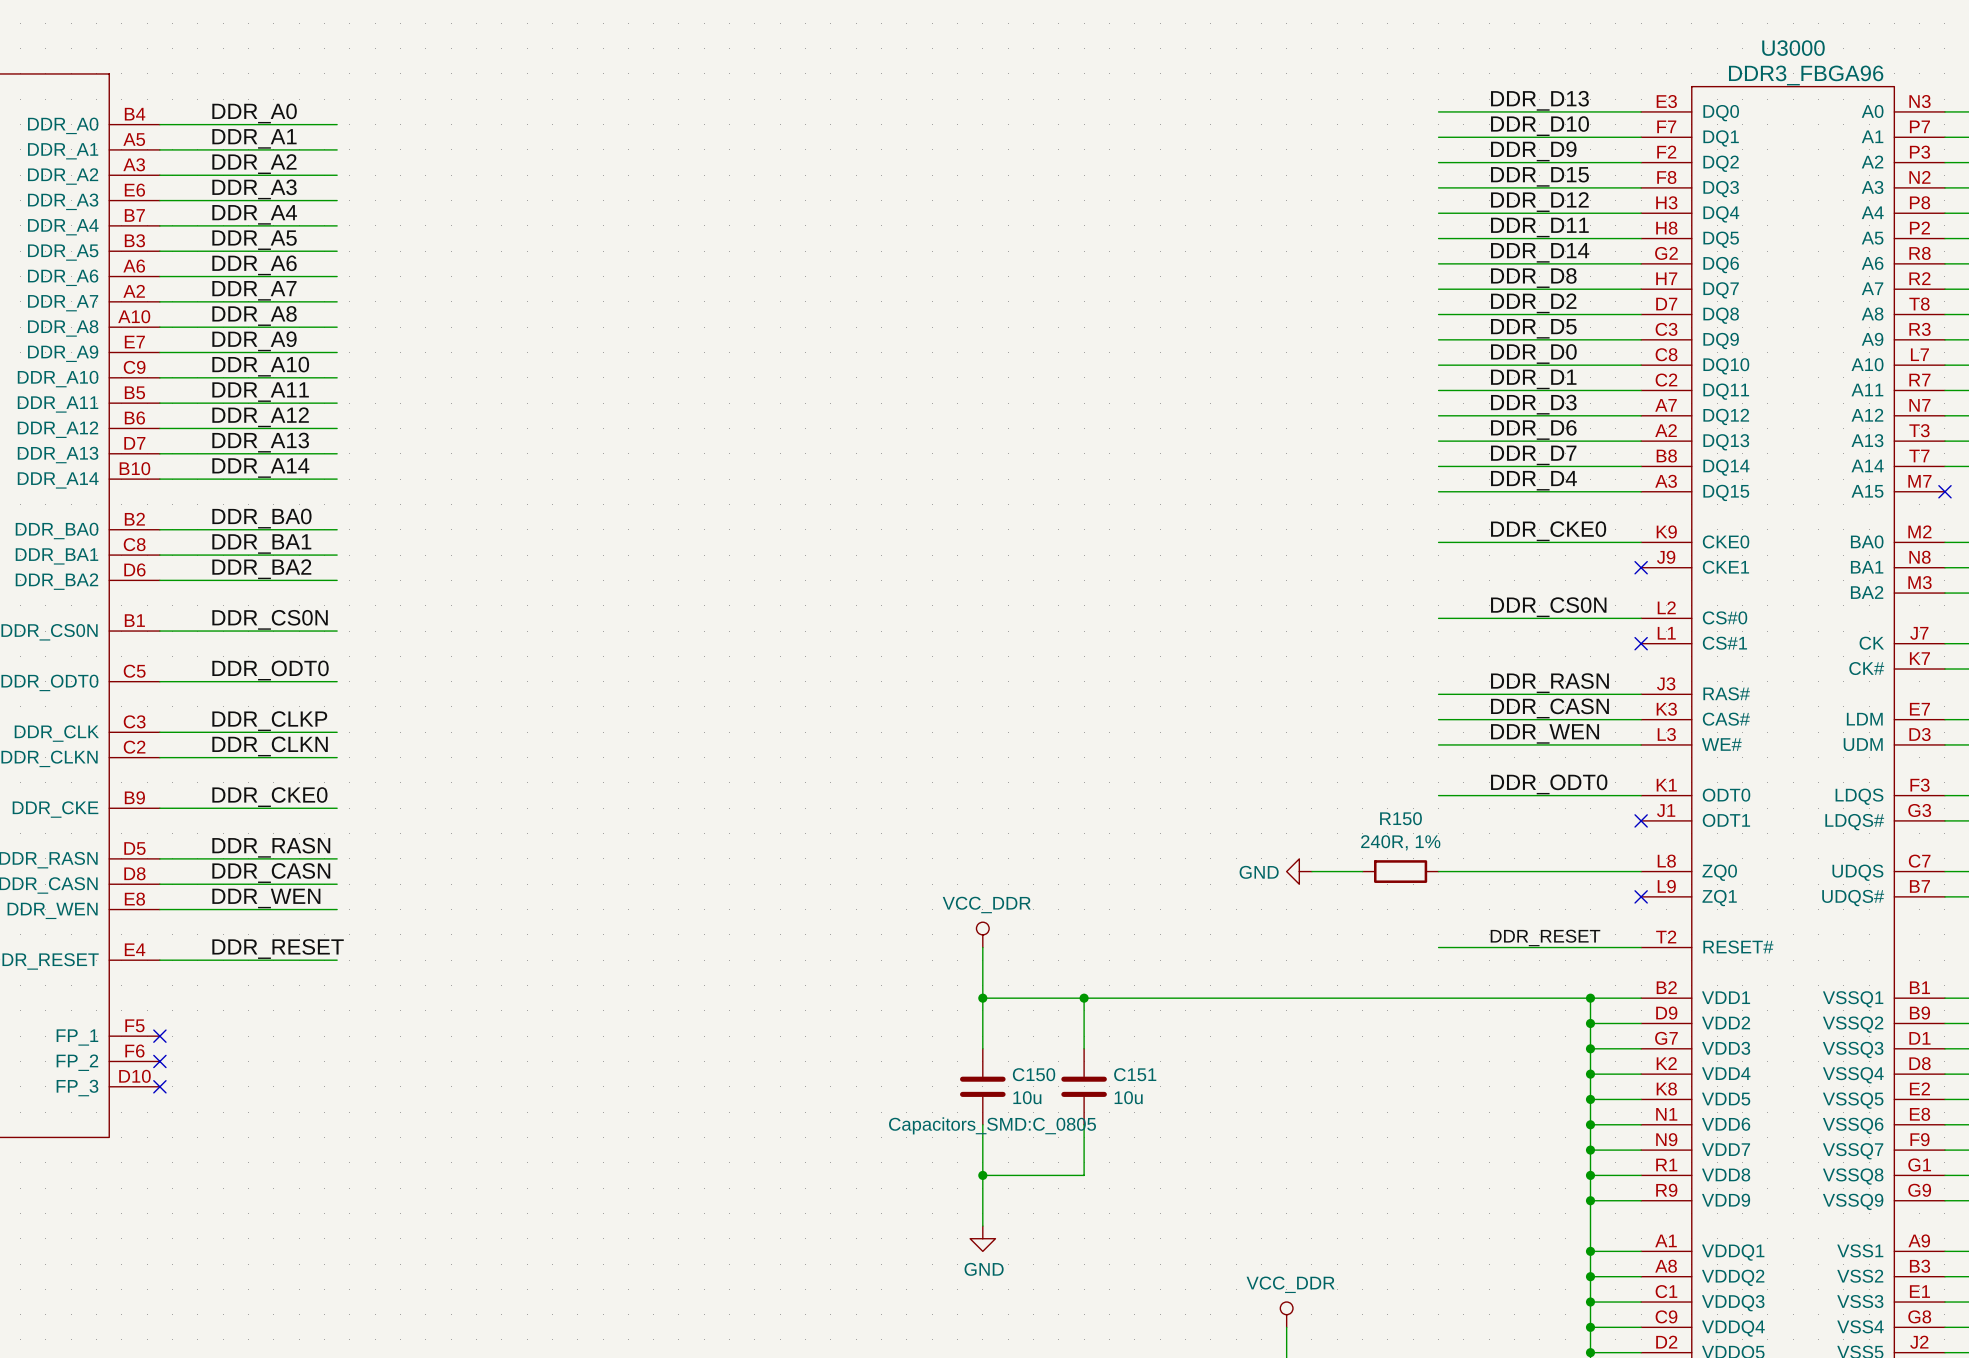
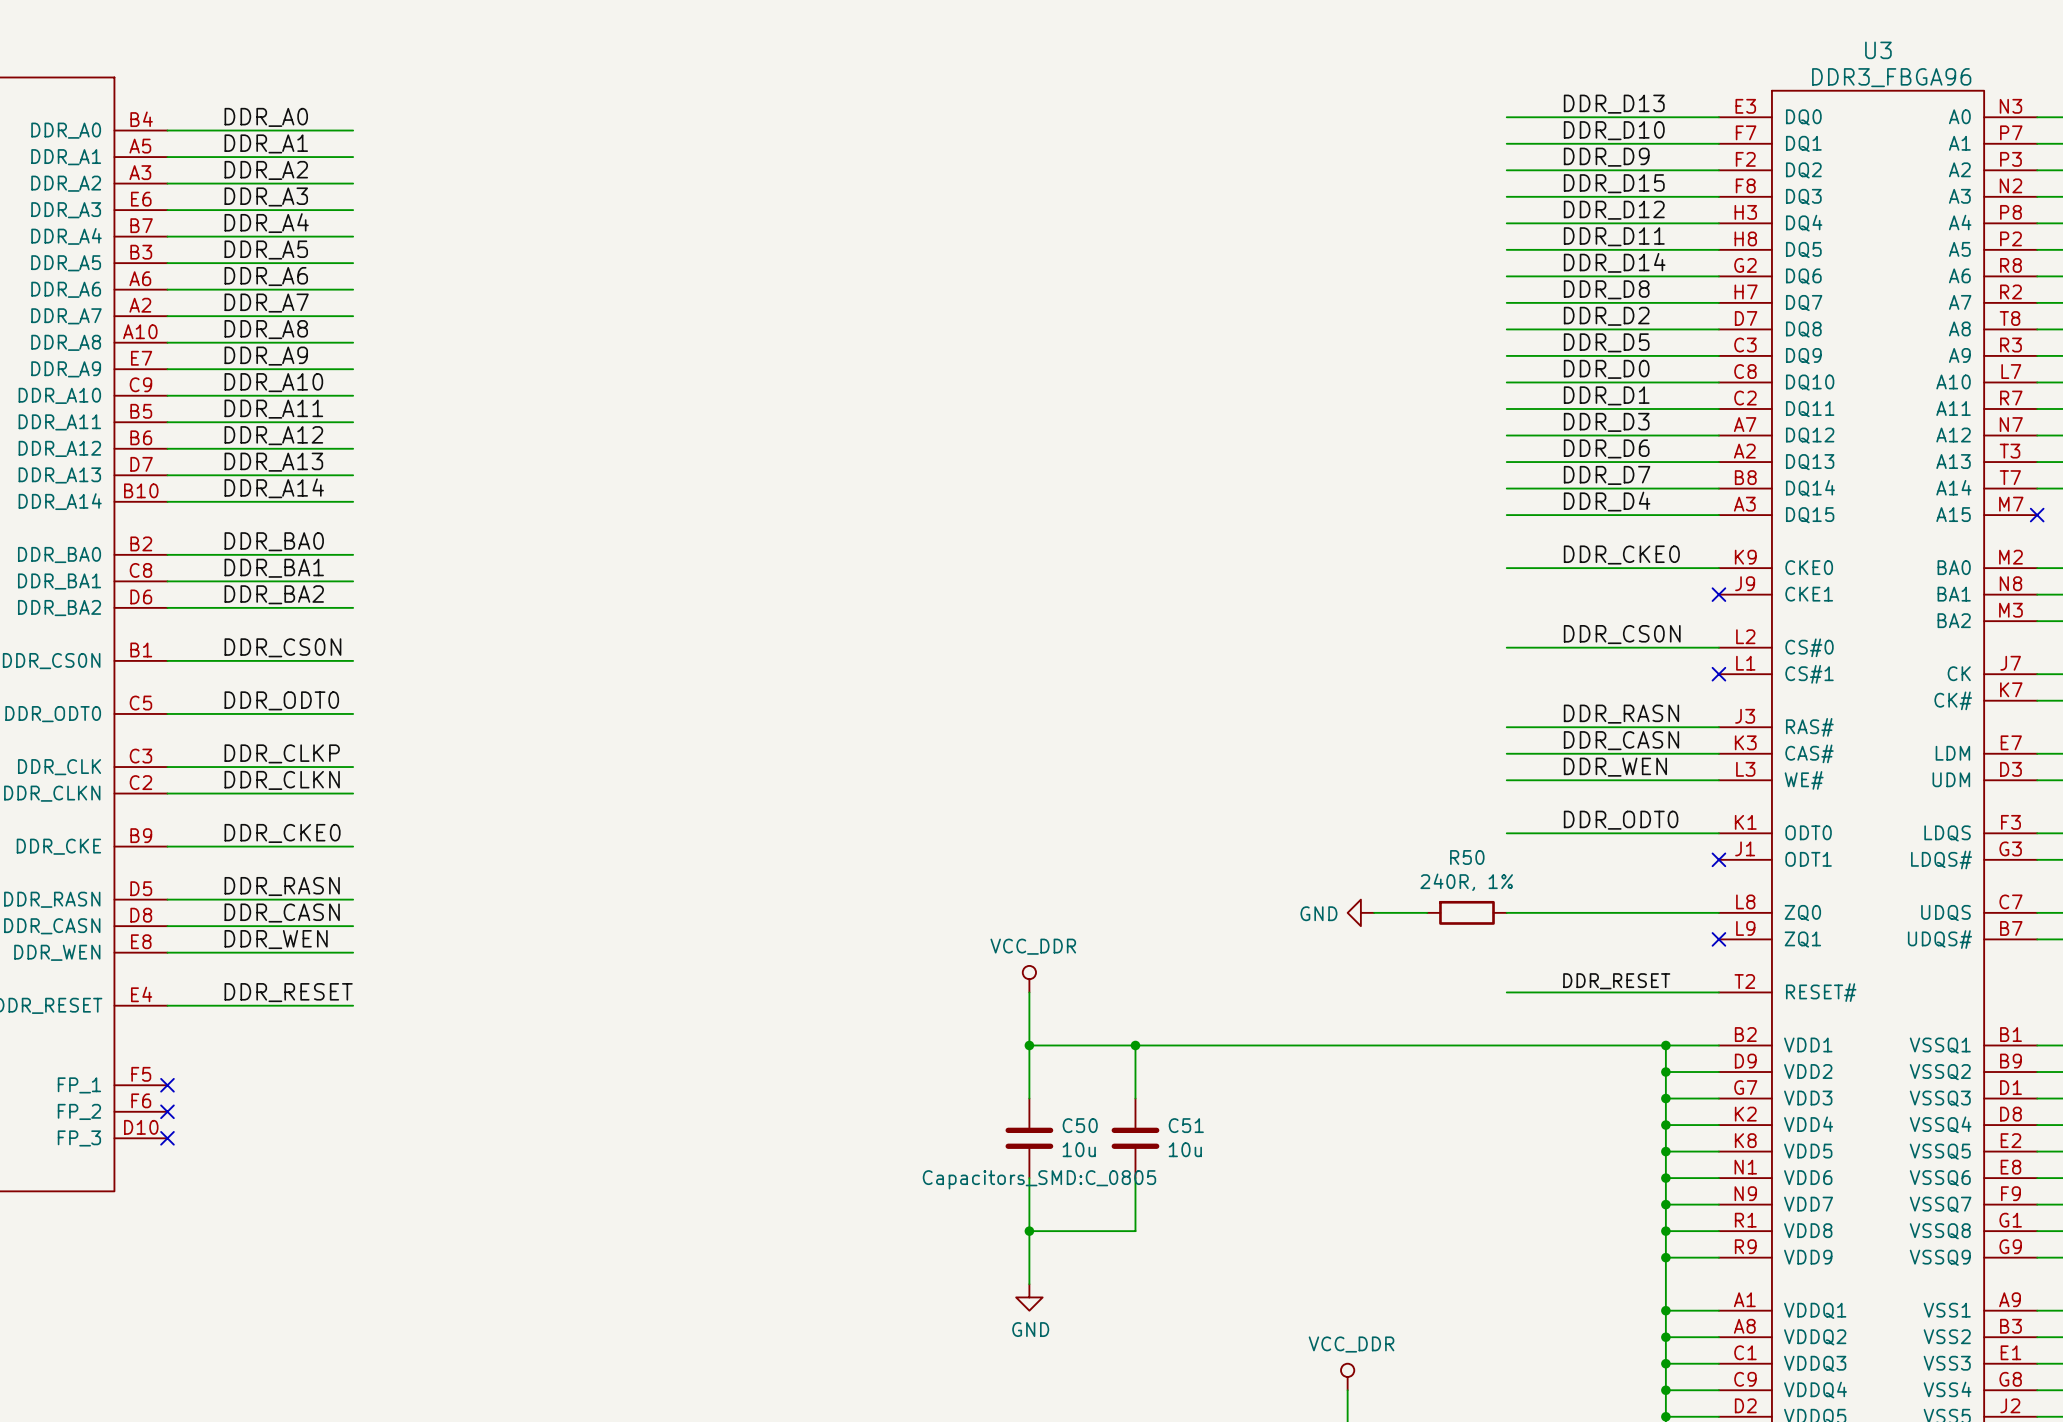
U3000 name: U3000 (1793, 48) -> U3 (1878, 50)
R150 name: R150 (1400, 818) -> R50 (1467, 857)
C150 name: C150 (1034, 1074) -> C50 (1080, 1125)
C151 name: C151 (1135, 1074) -> C51 (1186, 1125)

